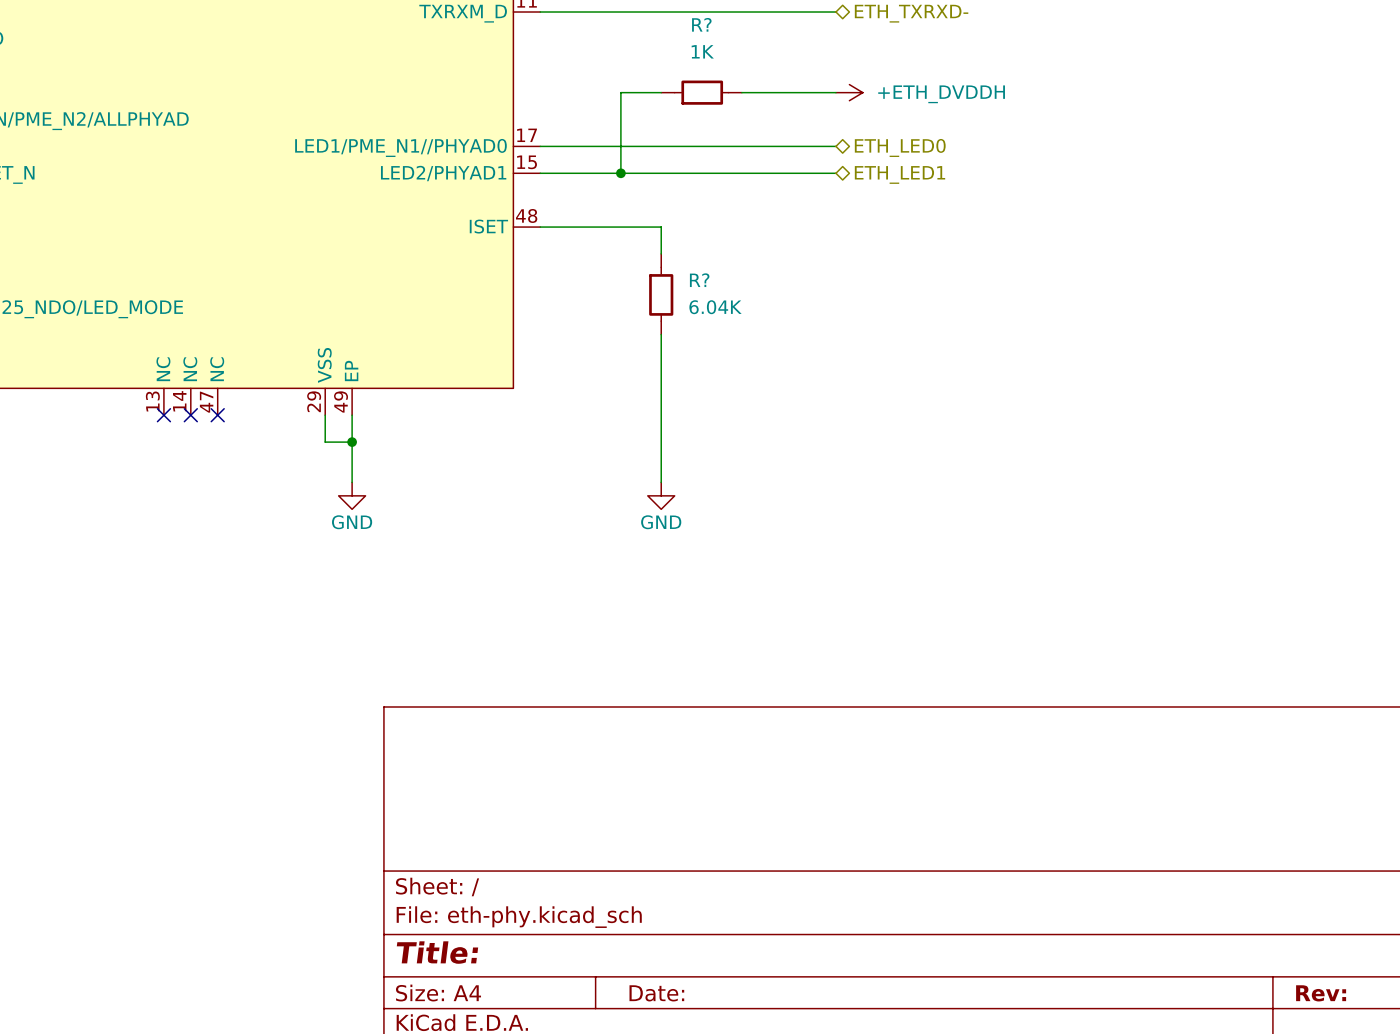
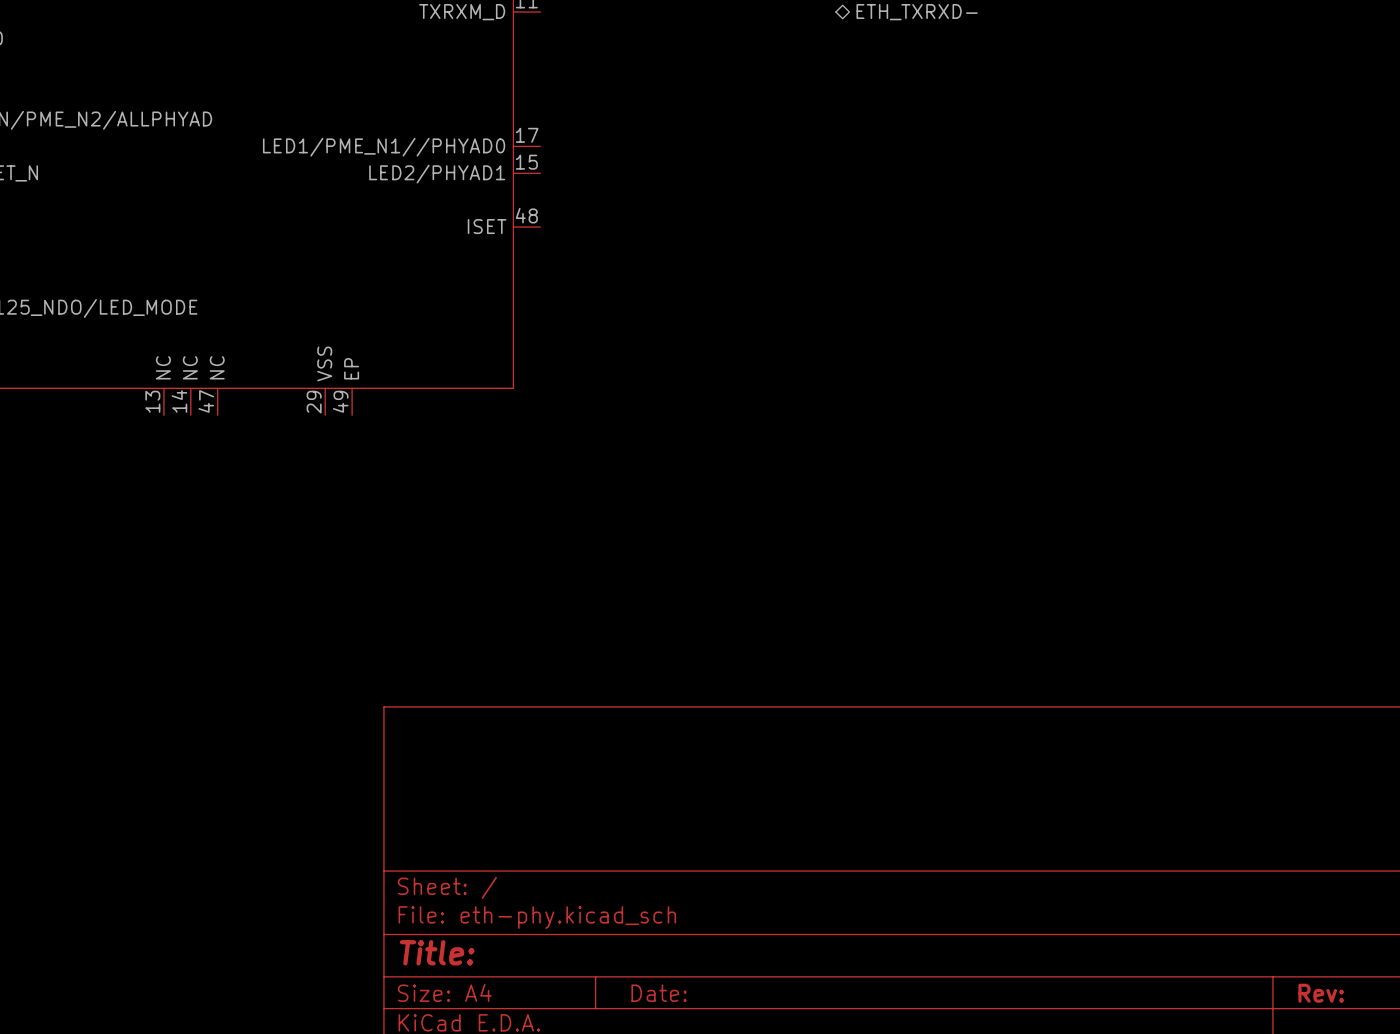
wire: (540, 12) (835, 12) -> none
wire: (661, 92) (620, 92) (620, 173) -> none
R?: (701, 92) -> none
wire: (741, 92) (835, 92) -> none
power symbol: +ETH_DVDDH (849, 92) -> none
wire: (540, 146) (835, 146) -> none
hierarchical label: ETH_LED0 (900, 147) -> none
wire: (540, 173) (835, 173) -> none
junction: (620, 173) -> none
hierarchical label: ETH_LED1 (900, 174) -> none
wire: (540, 227) (661, 227) (661, 253) -> none
R?: (661, 294) -> none
wire: (661, 334) (661, 482) -> none
no-connect mark: (163, 415) -> none
no-connect mark: (190, 415) -> none
no-connect mark: (217, 415) -> none
wire: (325, 415) (325, 442) (352, 442) -> none
wire: (352, 415) (352, 482) -> none
junction: (352, 442) -> none
power symbol: GND (352, 495) -> none
power symbol: GND (661, 495) -> none

